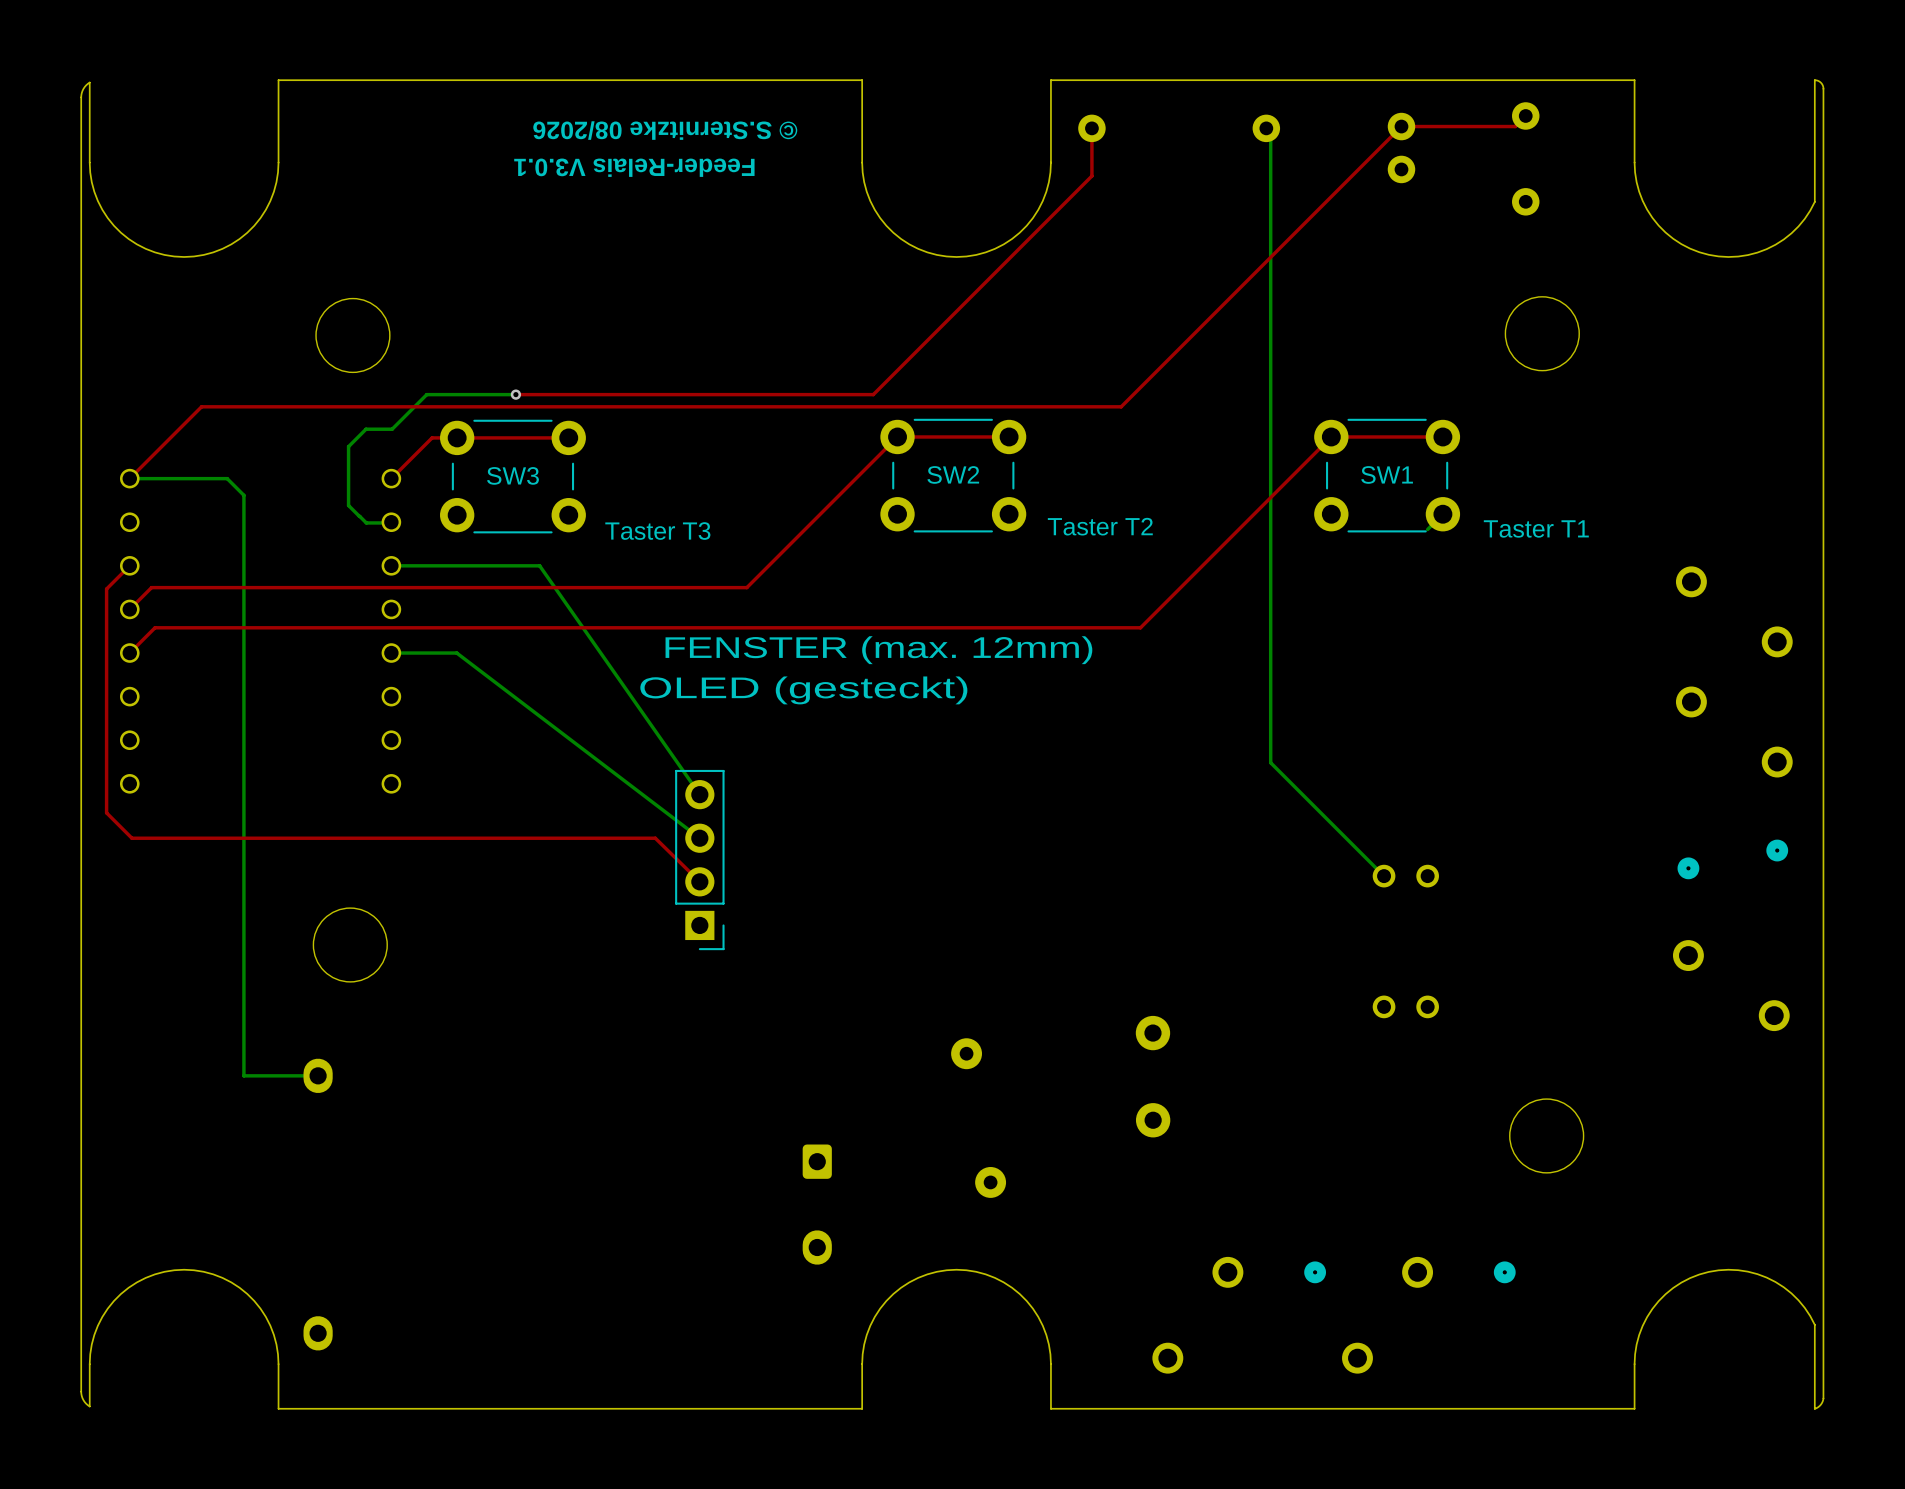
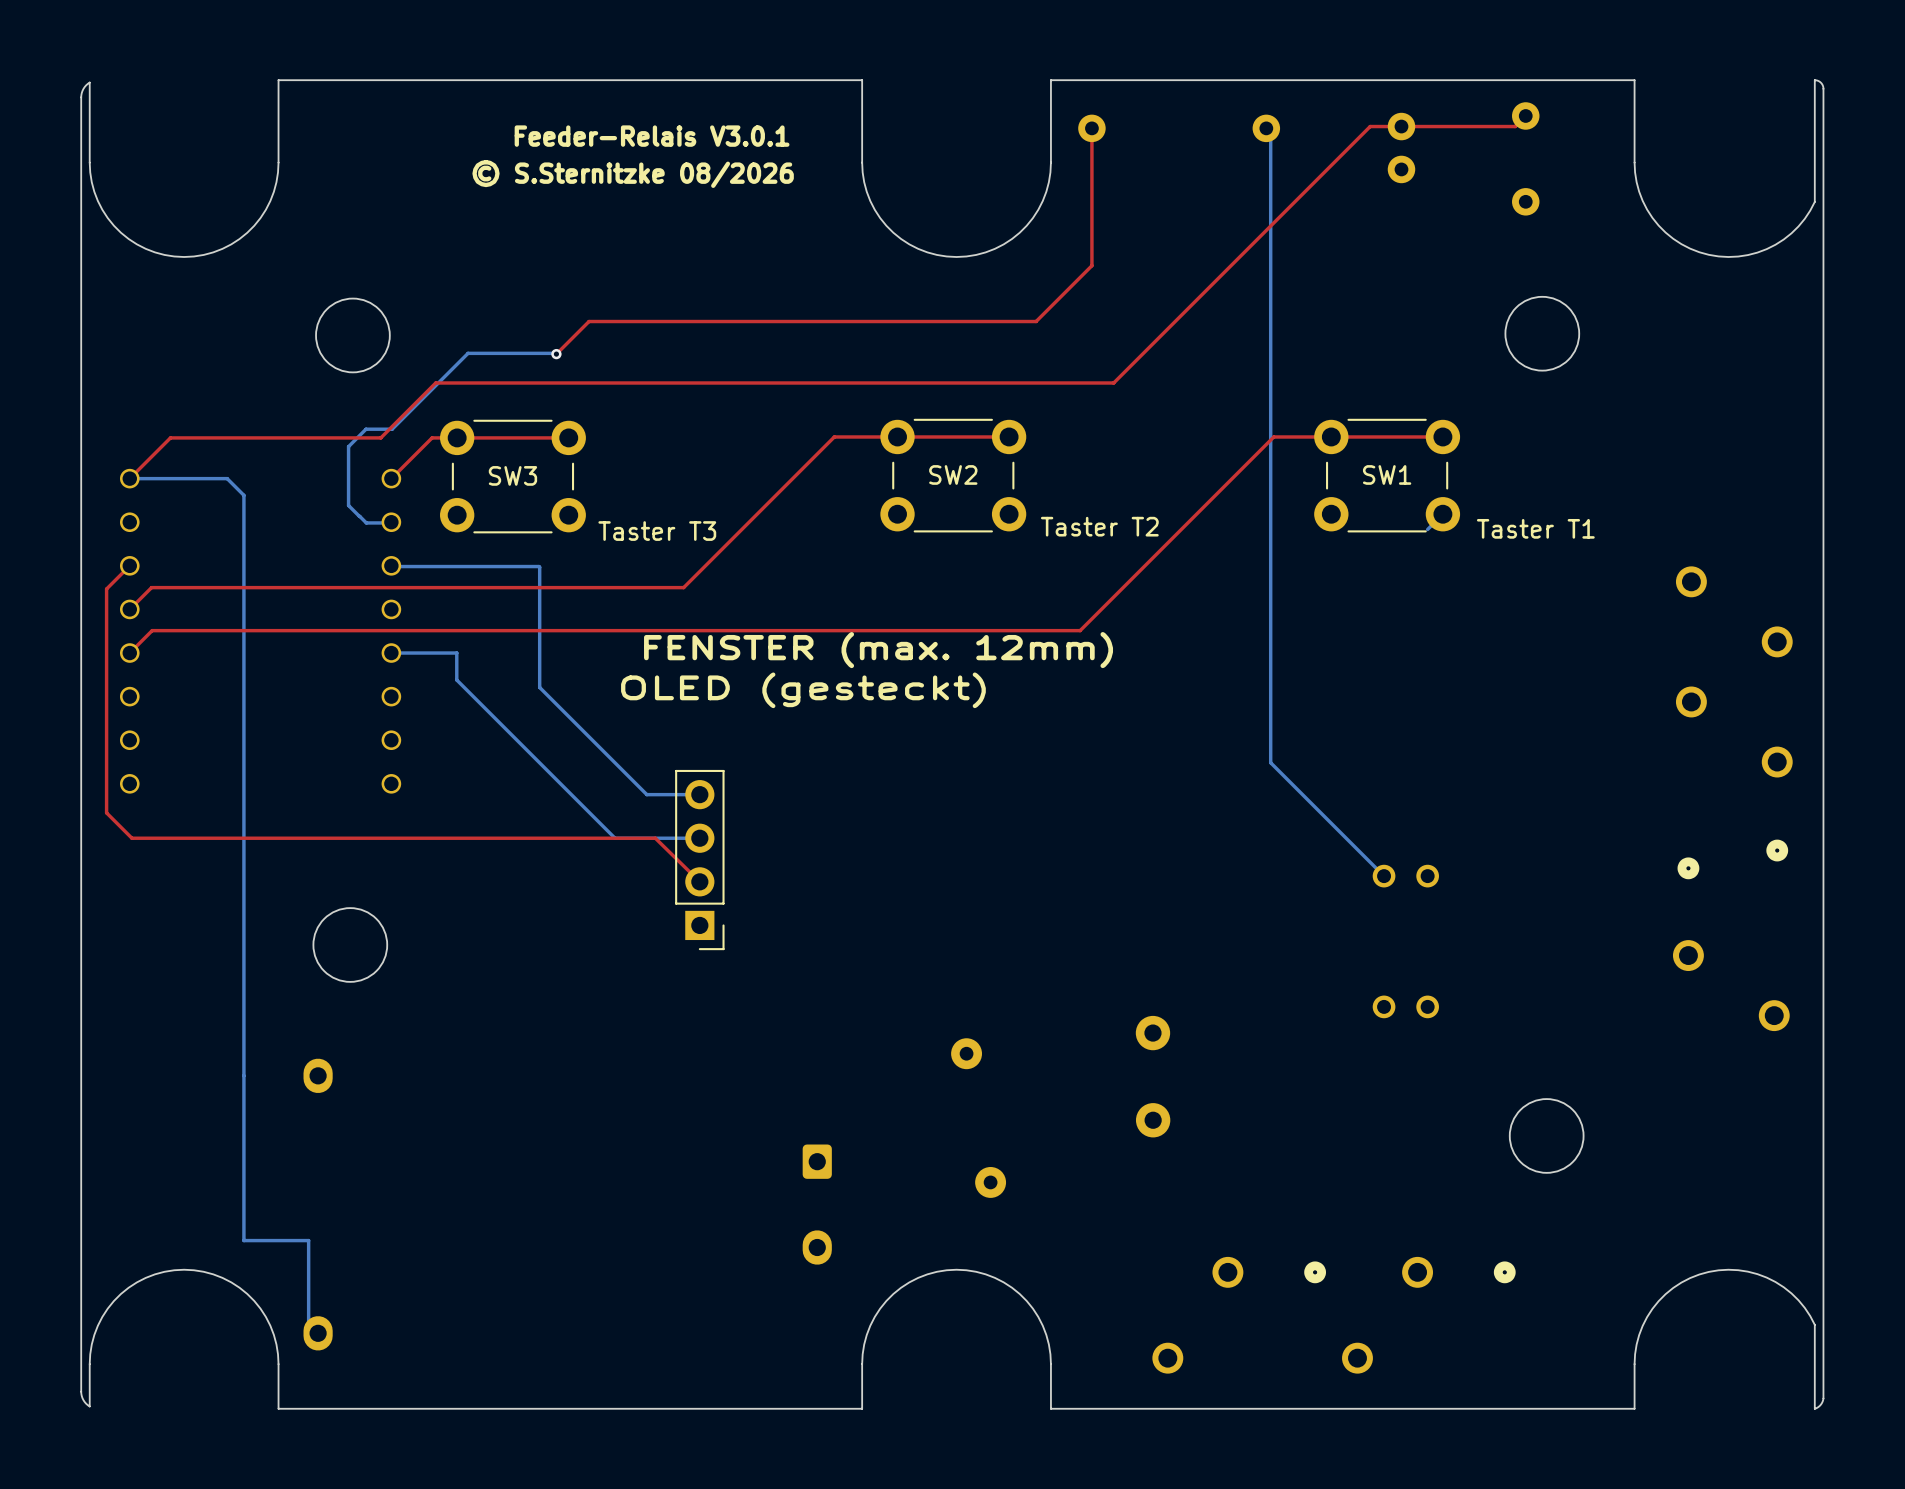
top track: (1401, 126) (1121, 406) (201, 406) (170, 437) -> (1401, 126) (1370, 126) (1113, 383) (435, 383) (380, 437) (170, 437)
text rotation: 0° (665, 130) -> 180° (633, 173)
text rotation: 0° (634, 167) -> 180° (652, 136)
top track: (1091, 176) (873, 394) (515, 394) -> (1091, 176) (1091, 265) (1036, 321) (589, 321) (556, 354)
bottom track: (426, 394) (515, 394) -> (426, 394) (468, 353) (556, 354)
via position: (515, 394) -> (556, 354)
top track: (897, 436) (746, 587) (683, 587) -> (897, 436) (834, 436) (683, 587)
top track: (1331, 436) (1140, 627) (155, 627) (152, 630) -> (1331, 436) (1273, 436) (1080, 630) (152, 630)
bottom track: (391, 565) (539, 565) (699, 794) -> (391, 565) (538, 566) (539, 687) (646, 794) (699, 794)
bottom track: (456, 653) (699, 838) -> (456, 653) (456, 679) (615, 838) (699, 838)
bottom track: (243, 1075) (318, 1075) -> (243, 1075) (243, 1240) (308, 1240) (308, 1333) (318, 1333)

